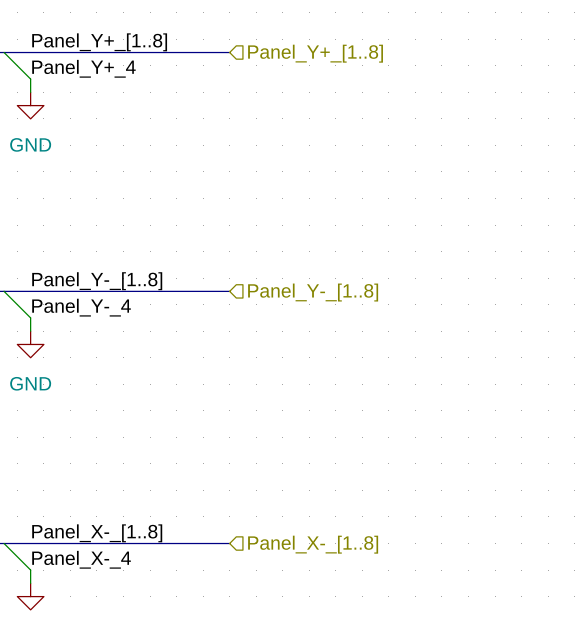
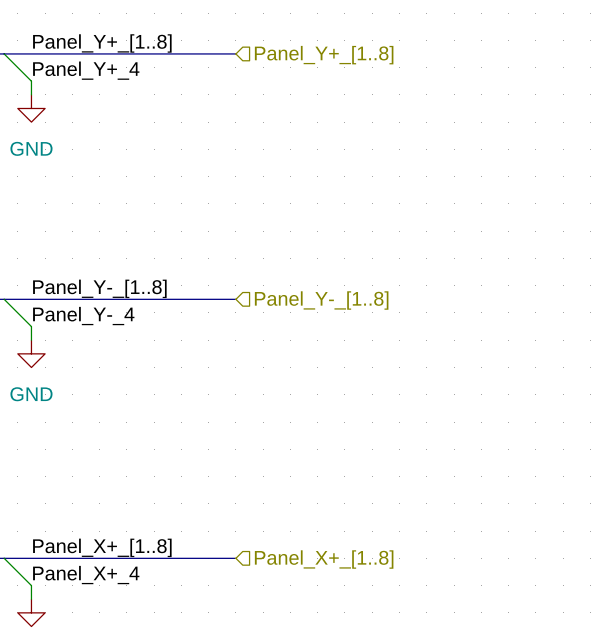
label: Panel_X-_[1..8] (97, 533) -> Panel_X+_[1..8] (102, 547)
hierarchical label: Panel_X-_[1..8] (313, 544) -> Panel_X+_[1..8] (324, 559)
label: Panel_X-_4 (81, 559) -> Panel_X+_4 (86, 575)

